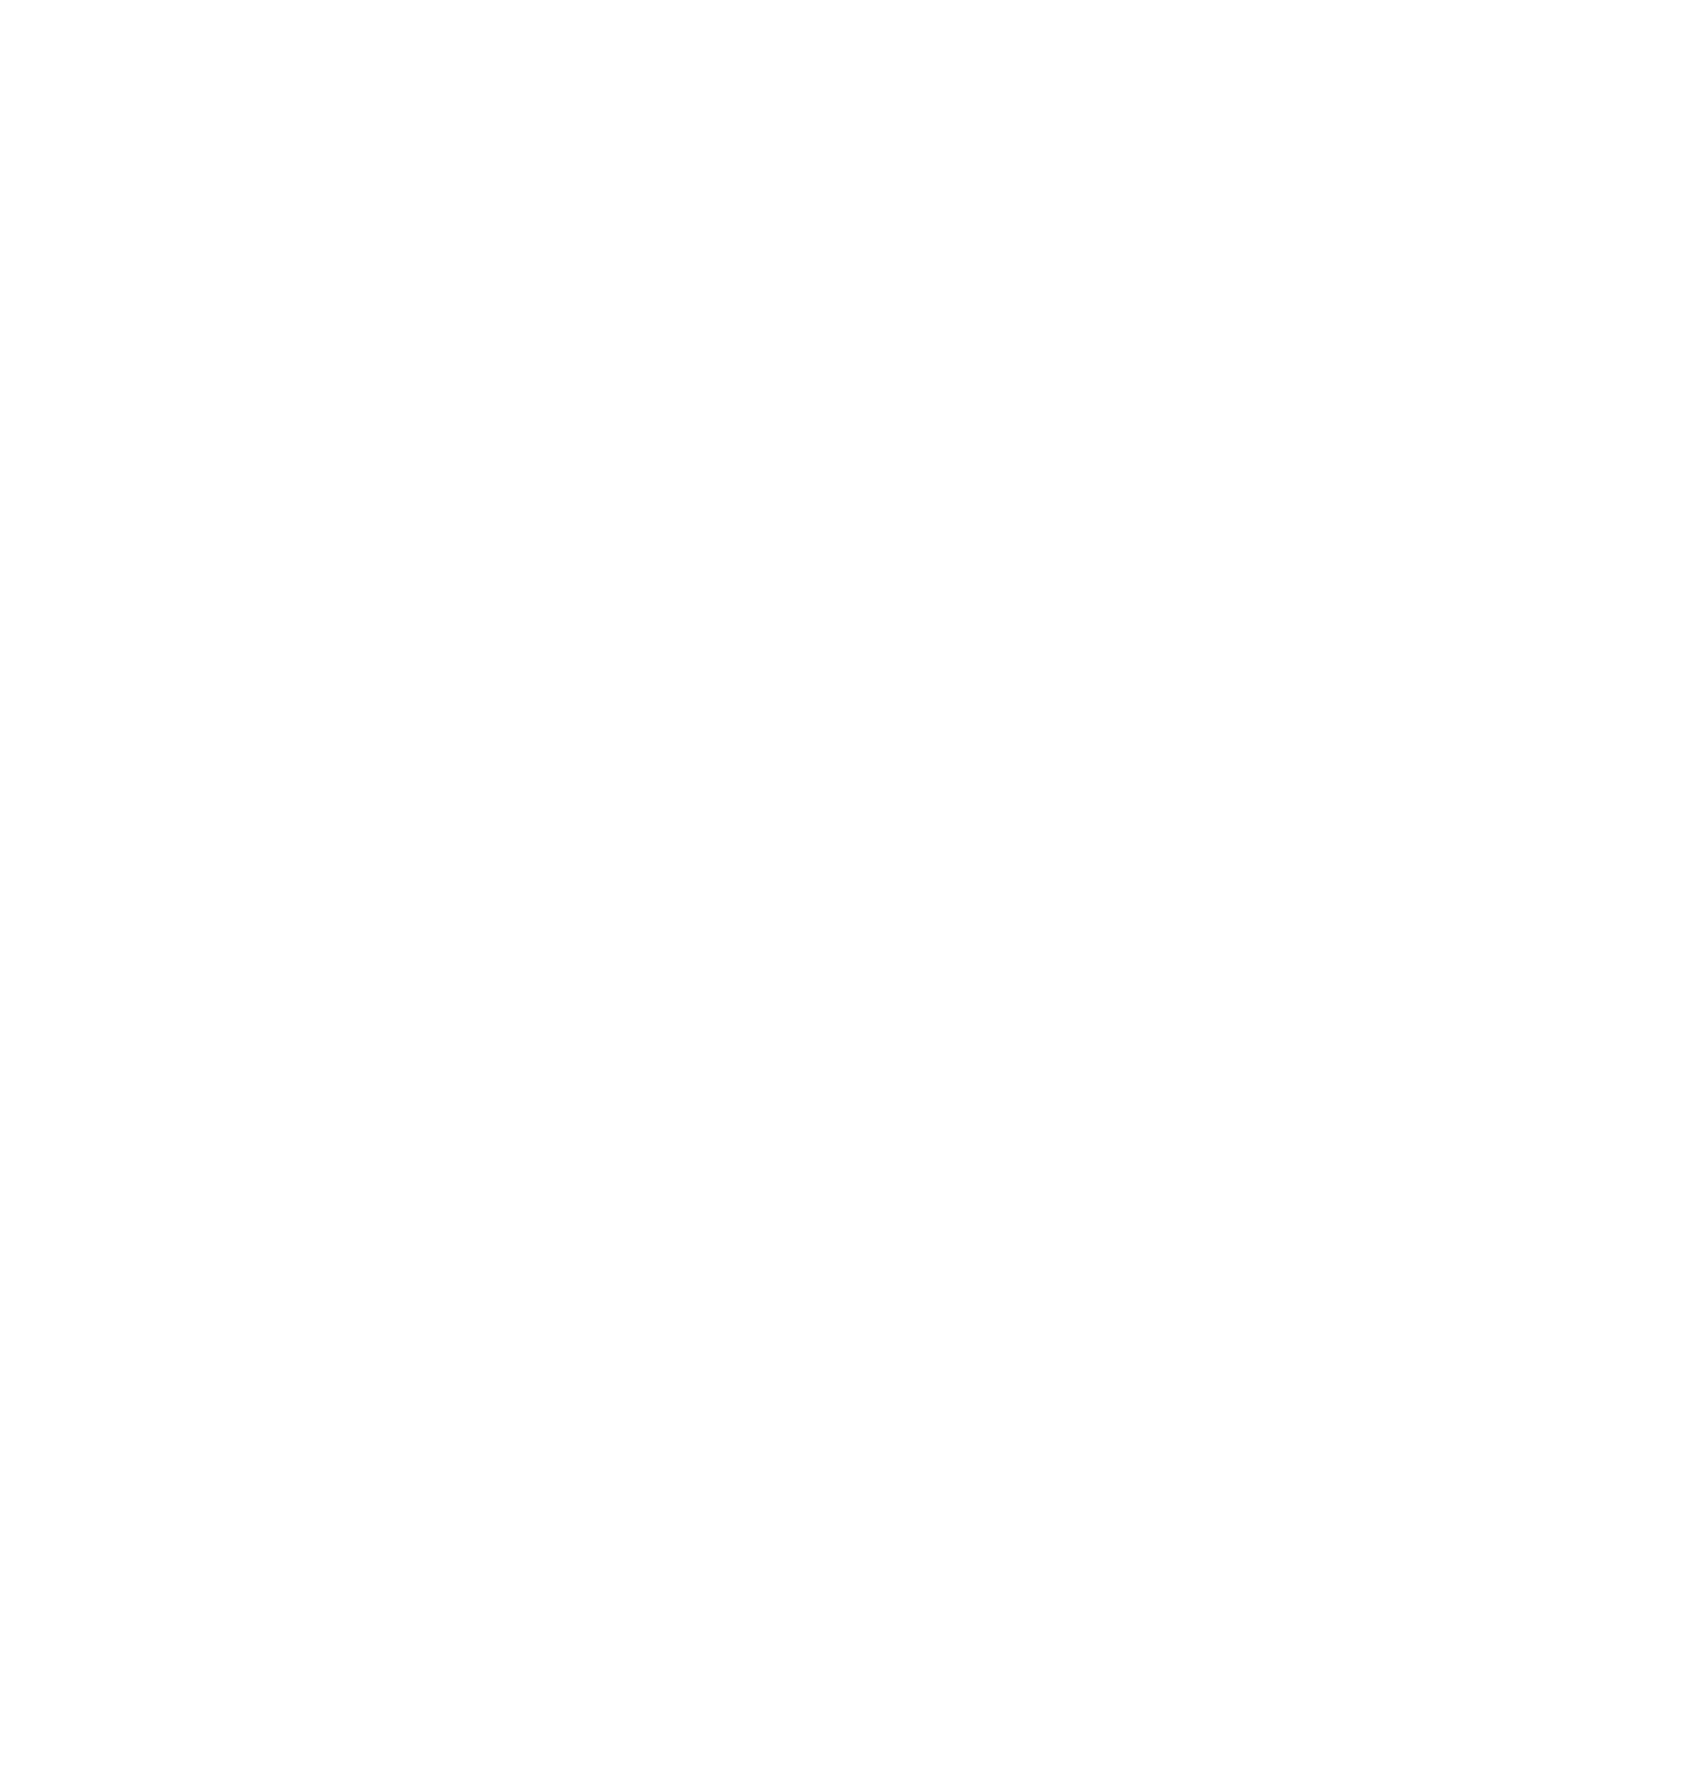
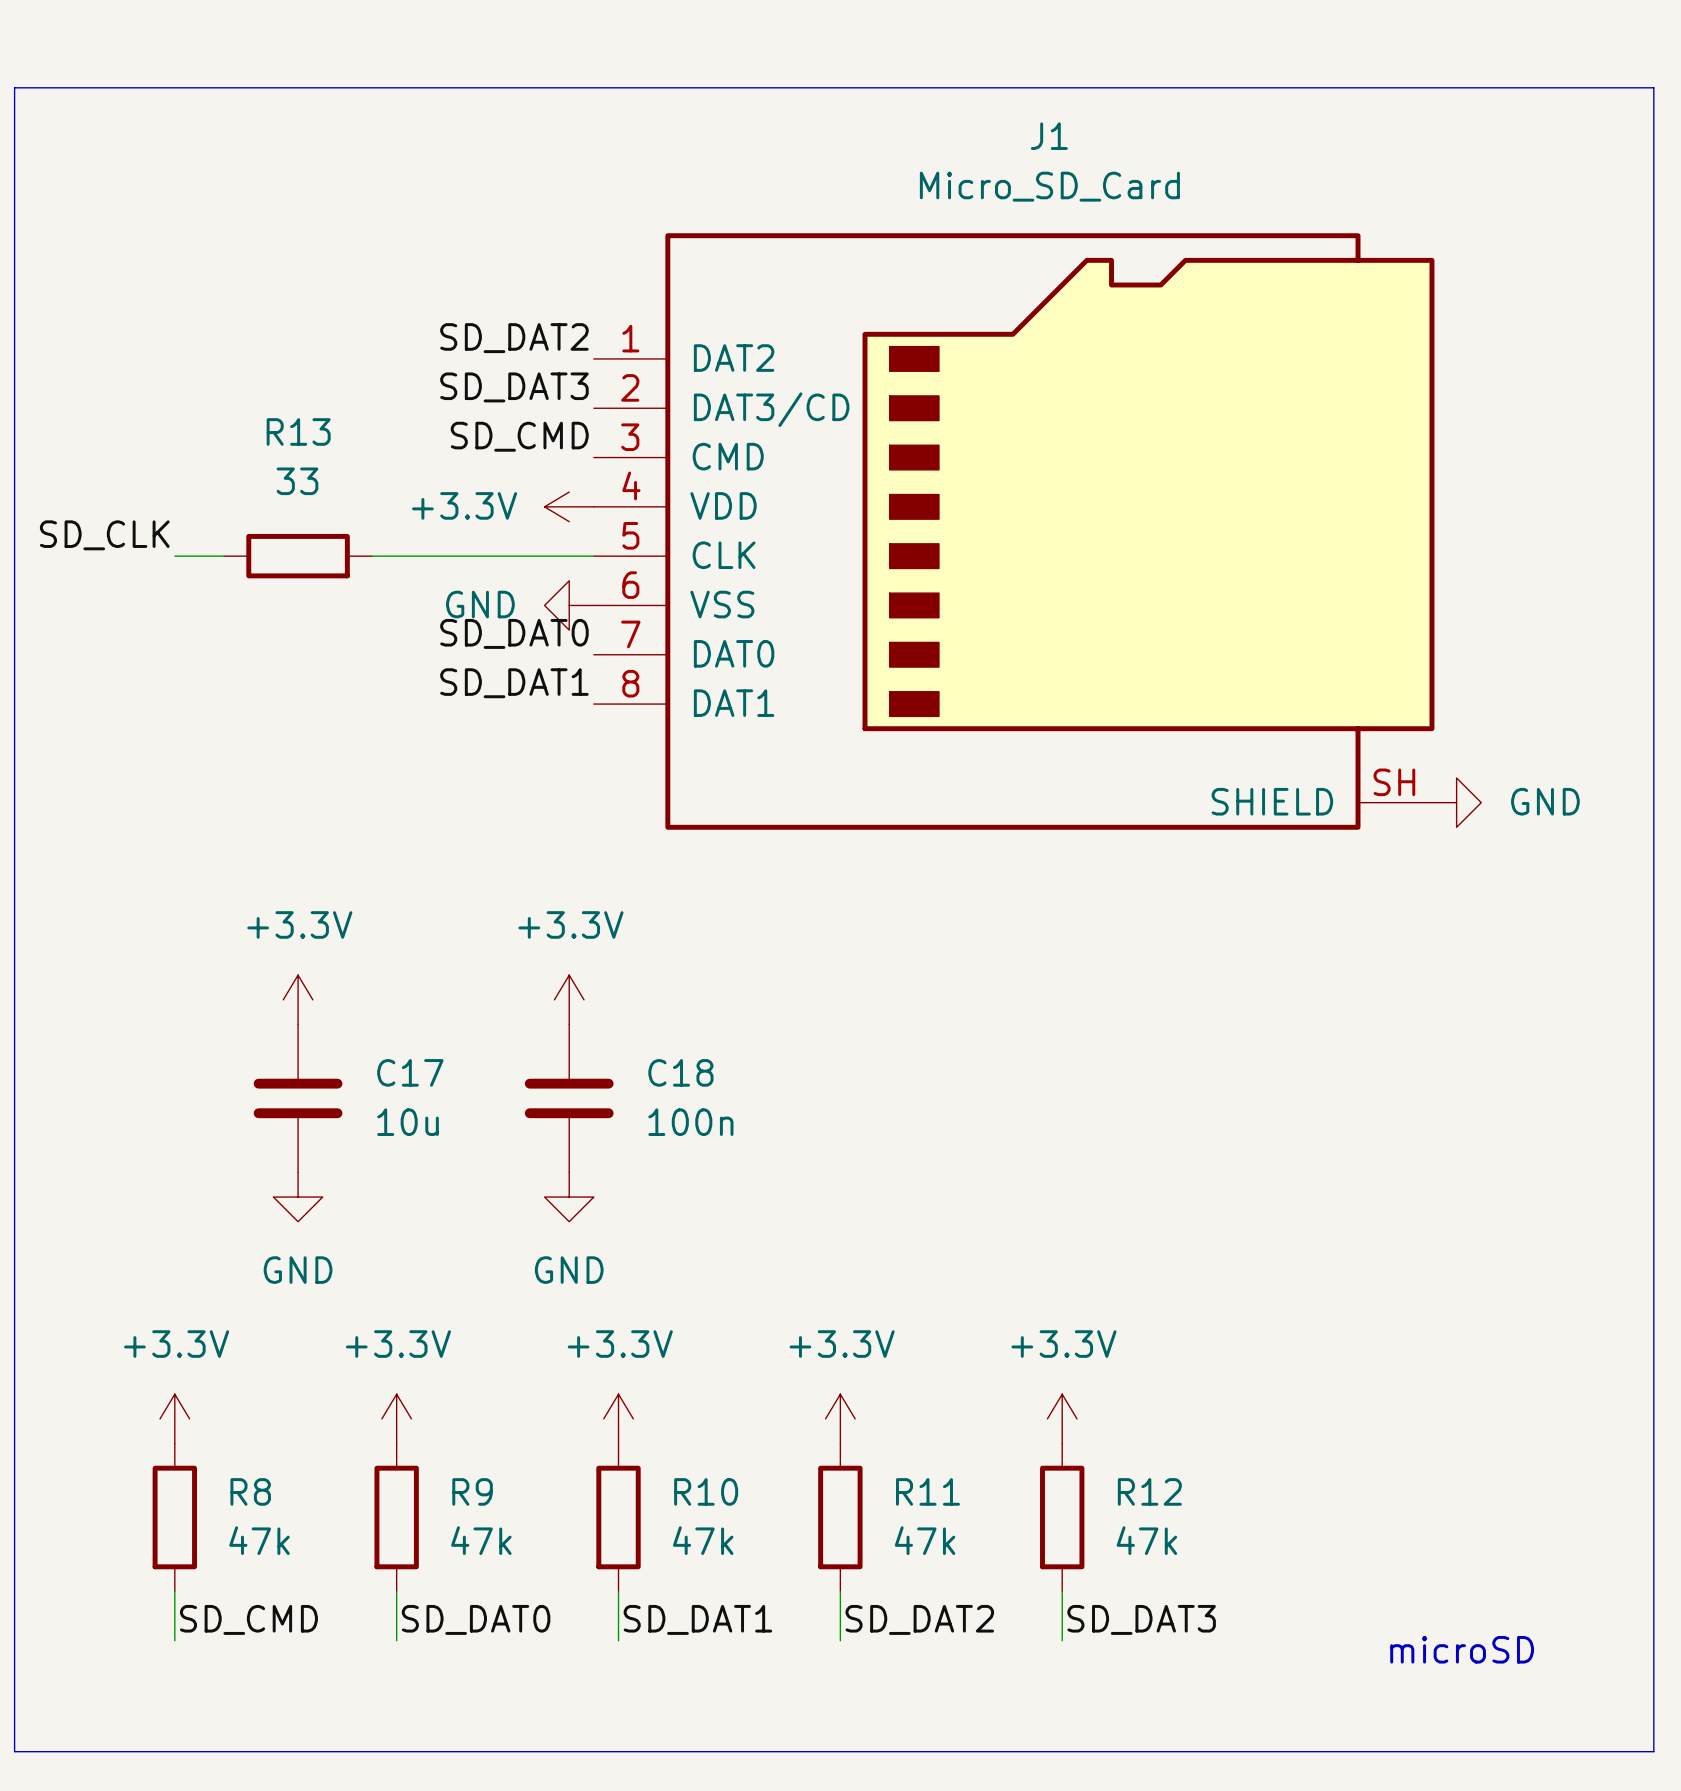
line: none -> (14, 87) (1653, 87) (1653, 1751) (14, 1751) (14, 87)
label: none -> SD_DAT2 (514, 338)
label: none -> SD_DAT3 (514, 387)
label: none -> SD_CMD (519, 436)
power symbol: none -> +3.3V (569, 506)
J1: none -> Micro_SD_Card (1014, 531)
label: none -> SD_CLK (104, 535)
wire: none -> (174, 556) (224, 556)
R13: none -> 33 (298, 556)
wire: none -> (372, 556) (593, 556)
power symbol: none -> GND (569, 605)
label: none -> SD_DAT0 (514, 633)
label: none -> SD_DAT1 (514, 683)
power symbol: none -> GND (1456, 802)
power symbol: none -> +3.3V (298, 999)
power symbol: none -> +3.3V (569, 999)
C17: none -> 10u (298, 1098)
C18: none -> 100n (569, 1098)
power symbol: none -> GND (298, 1197)
power symbol: none -> GND (569, 1197)
power symbol: none -> +3.3V (174, 1418)
power symbol: none -> +3.3V (396, 1418)
power symbol: none -> +3.3V (618, 1418)
power symbol: none -> +3.3V (840, 1418)
power symbol: none -> +3.3V (1062, 1418)
R8: none -> 47k (174, 1517)
R9: none -> 47k (396, 1517)
R10: none -> 47k (618, 1517)
R11: none -> 47k (840, 1517)
R12: none -> 47k (1062, 1517)
wire: none -> (174, 1591) (174, 1640)
wire: none -> (396, 1591) (396, 1640)
wire: none -> (618, 1591) (618, 1640)
wire: none -> (840, 1591) (840, 1640)
wire: none -> (1062, 1591) (1062, 1640)
label: none -> SD_CMD (248, 1619)
label: none -> SD_DAT0 (476, 1619)
label: none -> SD_DAT1 (697, 1619)
label: none -> SD_DAT2 (919, 1619)
label: none -> SD_DAT3 (1141, 1619)
text: none -> microSD (1462, 1649)

